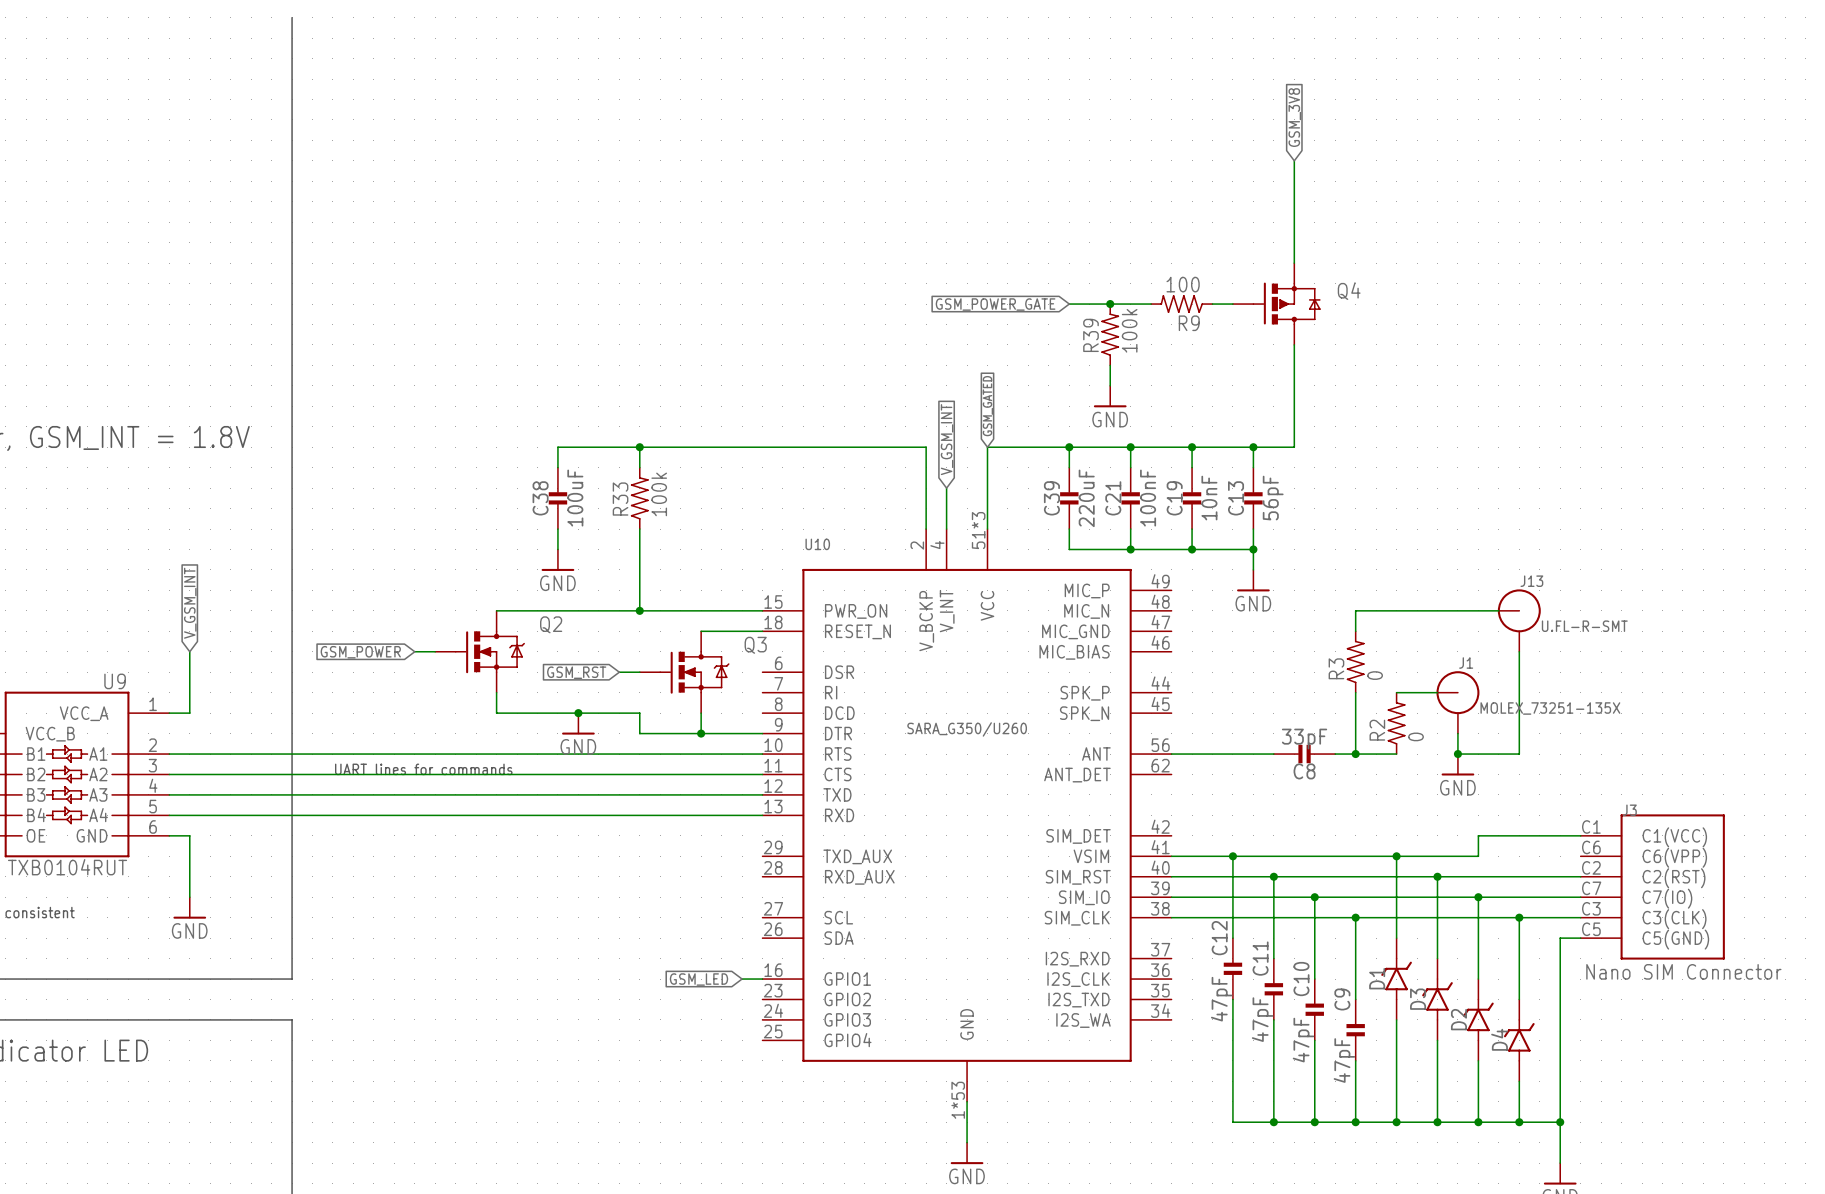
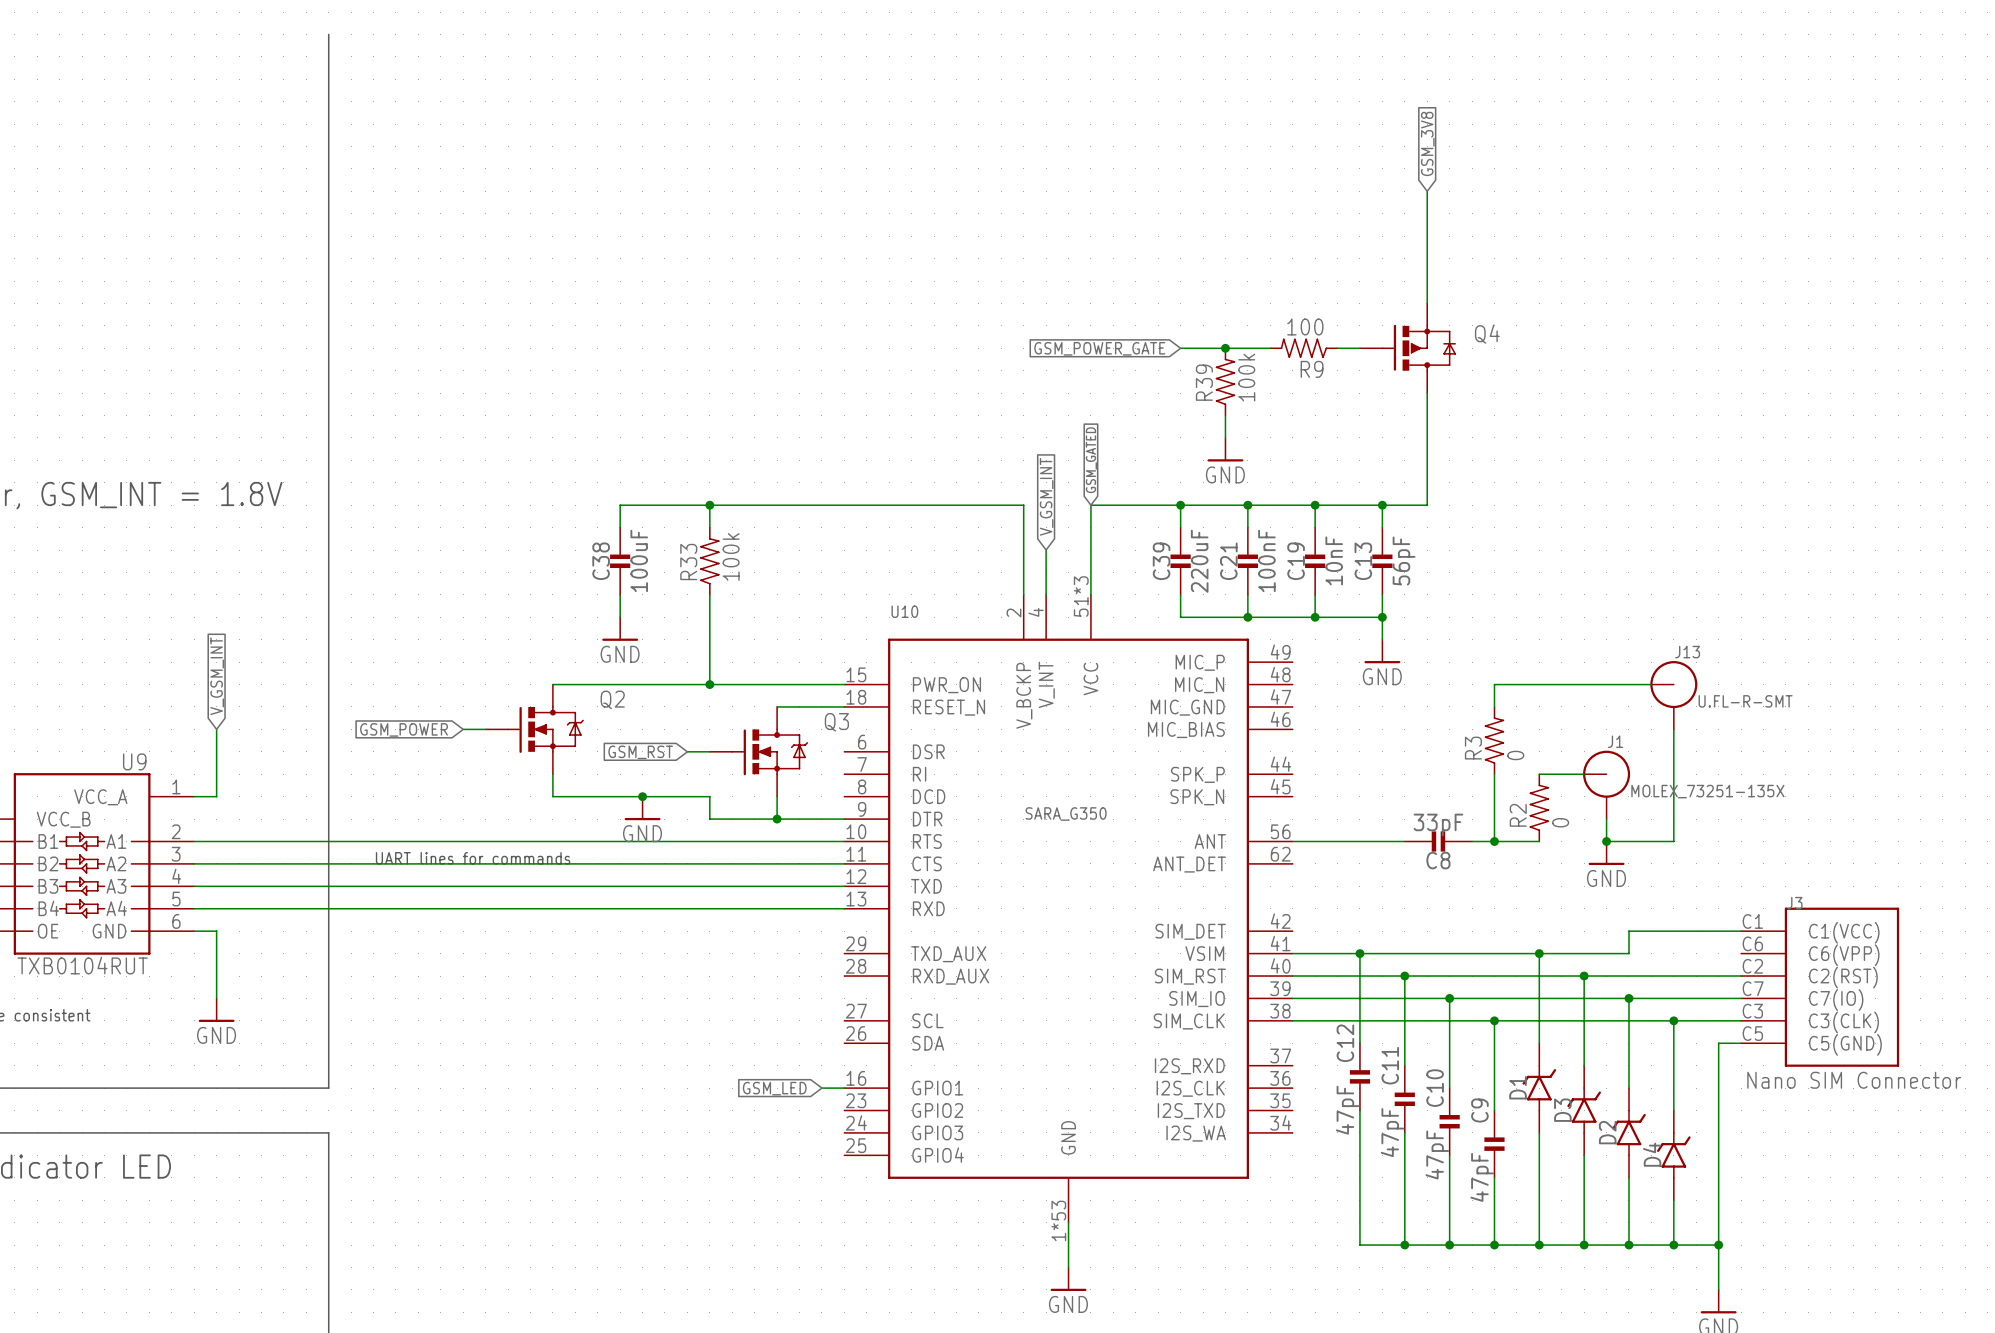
U10 text: none -> SARA_G350 (1066, 814)
U10 text: SARA_G350/U260 (967, 729) -> none

